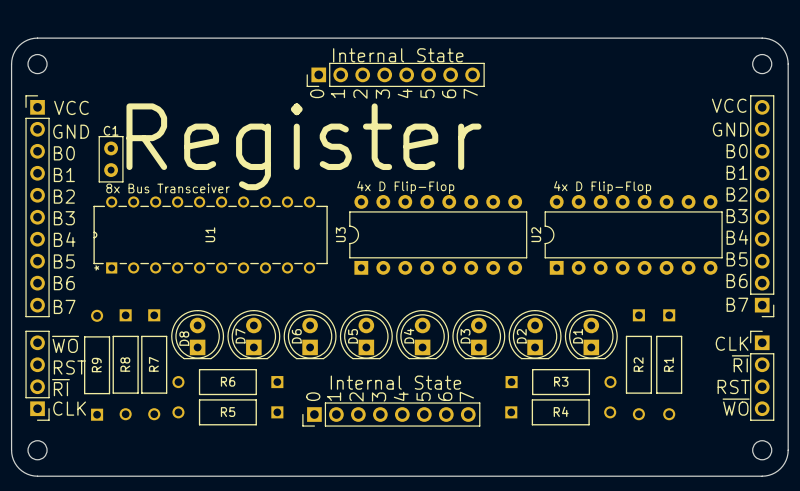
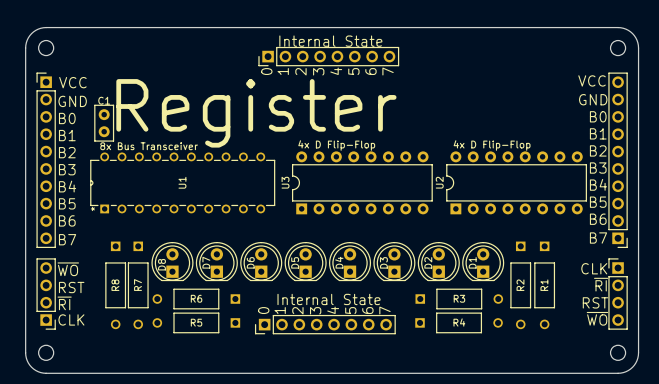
R9: (97, 365) -> none

